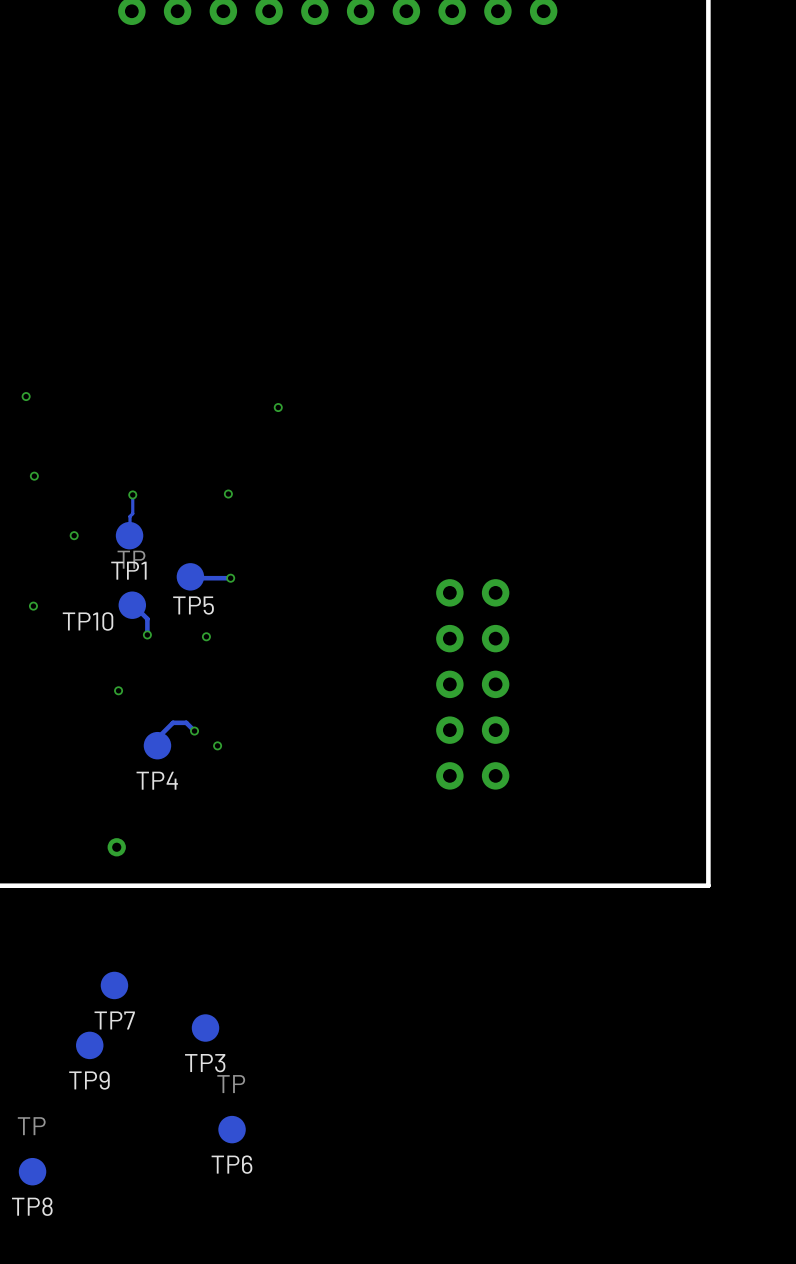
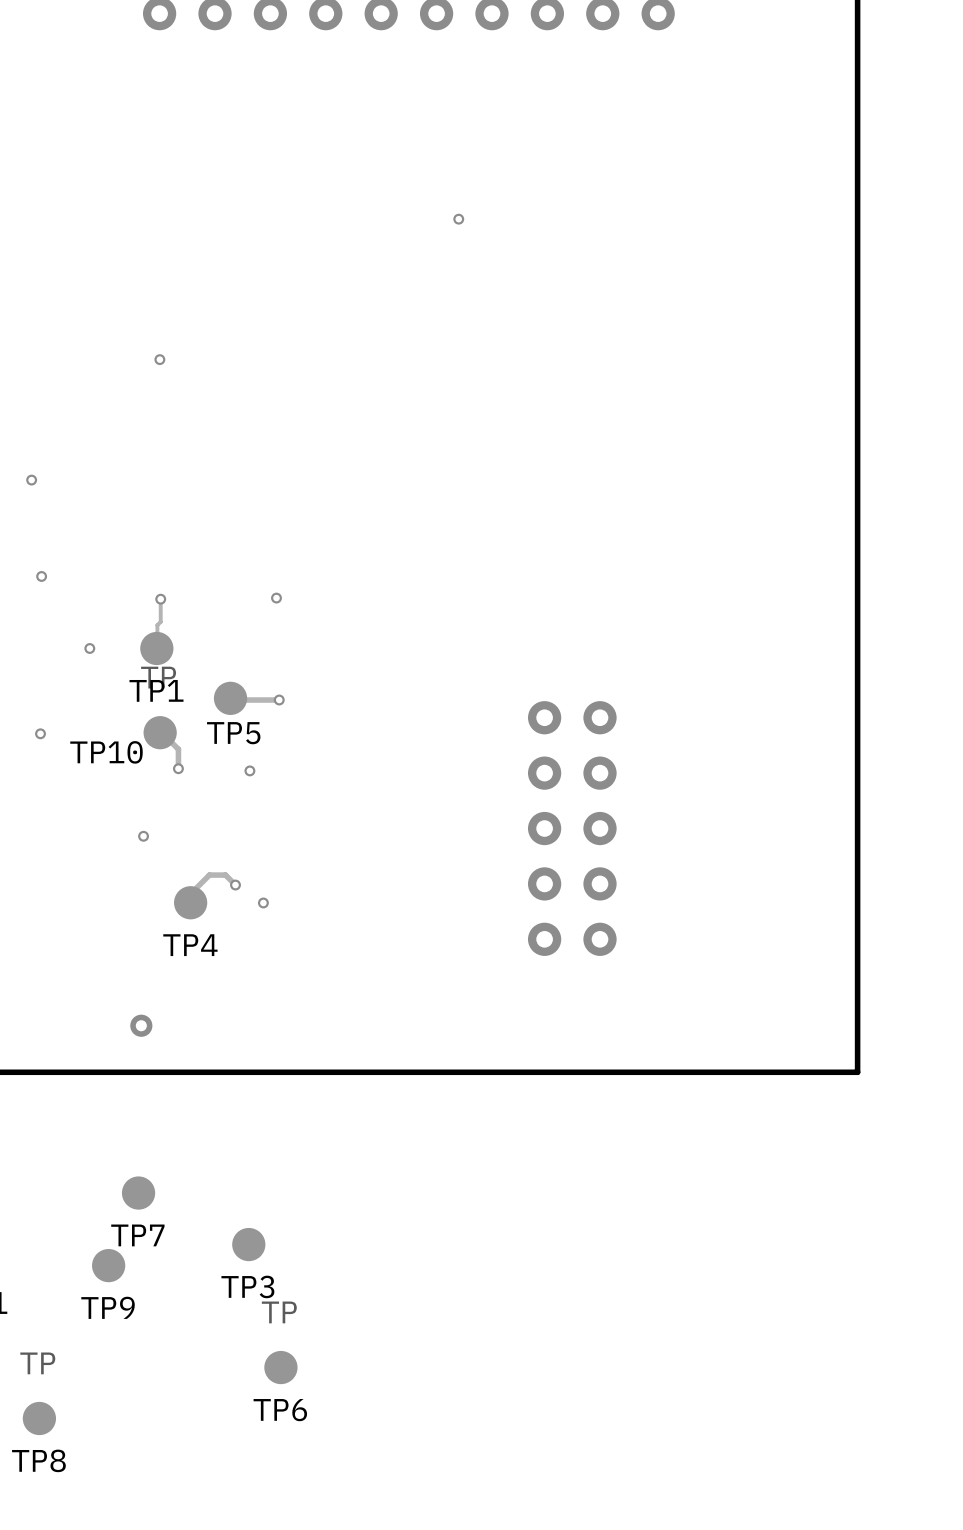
via: none -> (458, 219)
via: none -> (159, 359)
via: (278, 407) -> none

